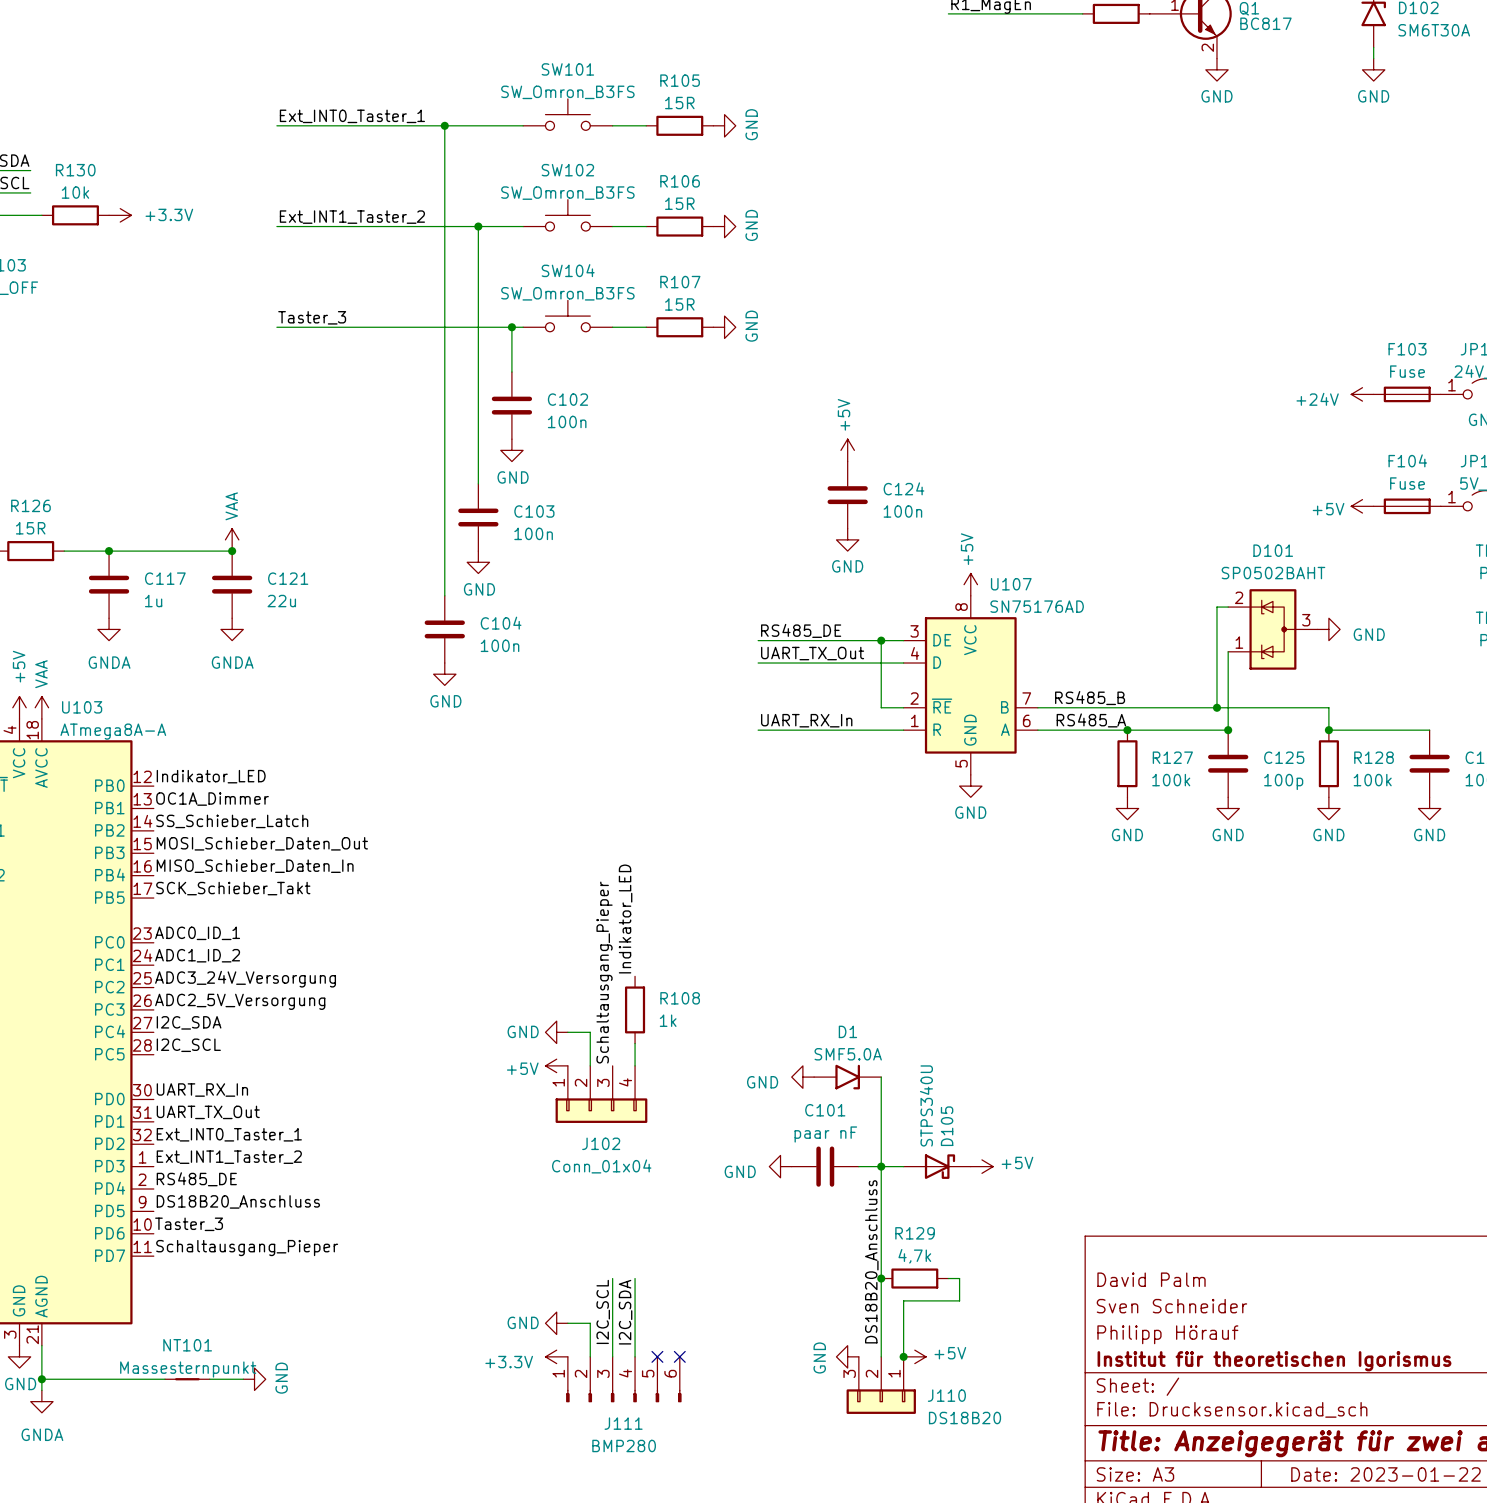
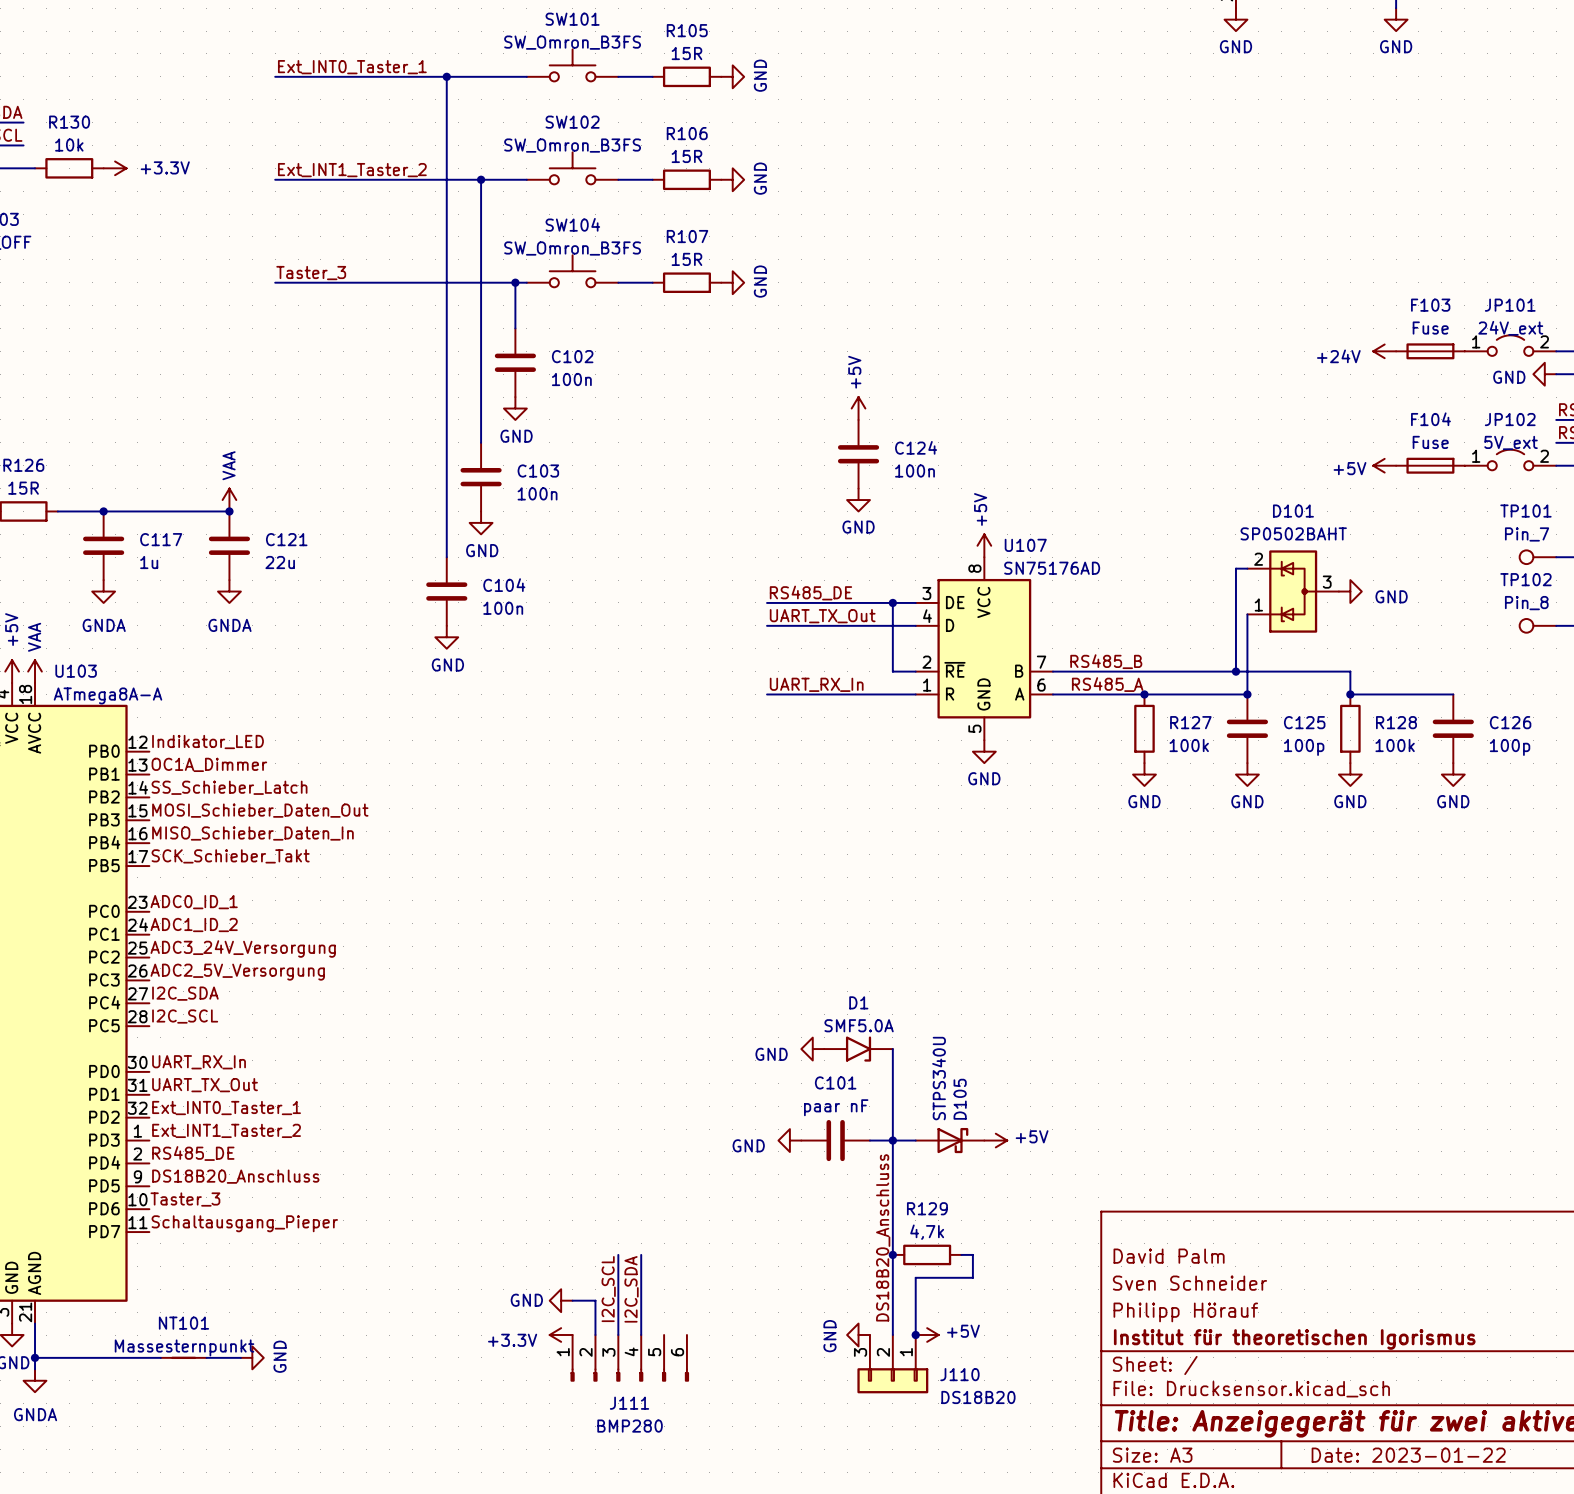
label: Indikator_LED (625, 918) -> none
label: Schaltausgang_Pieper (604, 972) -> none
R108: 1k (635, 1009) -> none
power symbol: GND (556, 1032) -> none
wire: (567, 1032) (590, 1032) (590, 1065) -> none
wire: (635, 1043) (635, 1065) -> none
power symbol: +5V (556, 1065) -> none
J102: Conn_01x04 (601, 1094) -> none
no-connect mark: (657, 1356) -> none
no-connect mark: (679, 1356) -> none

